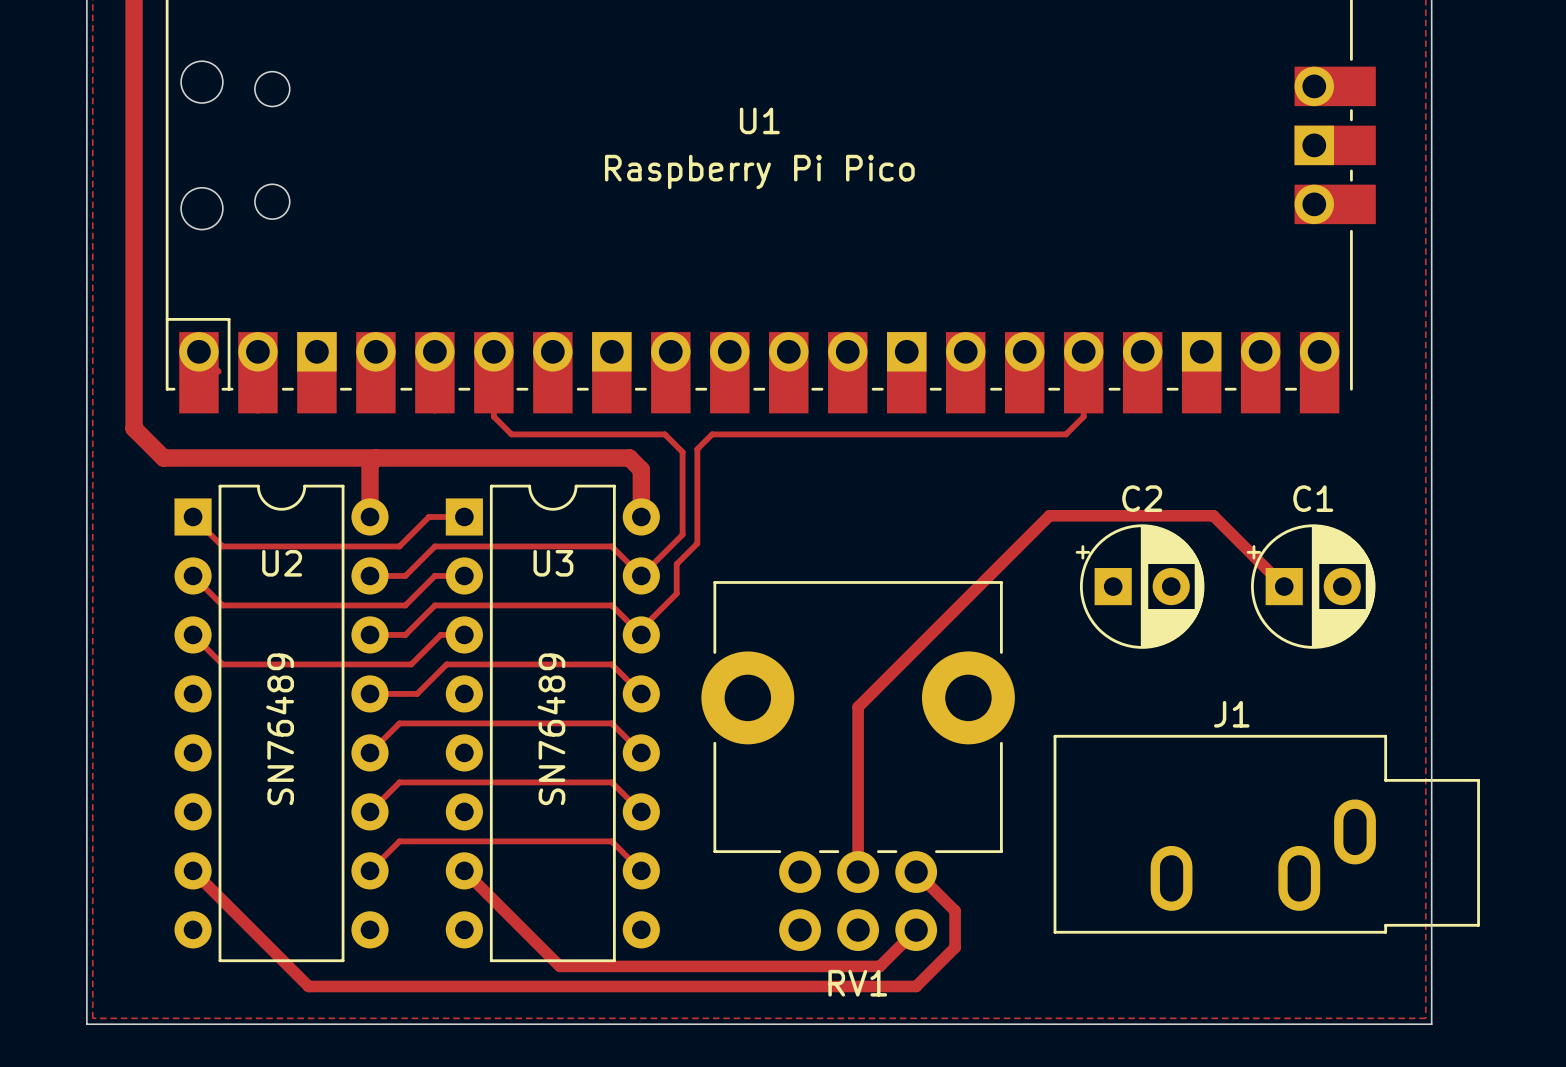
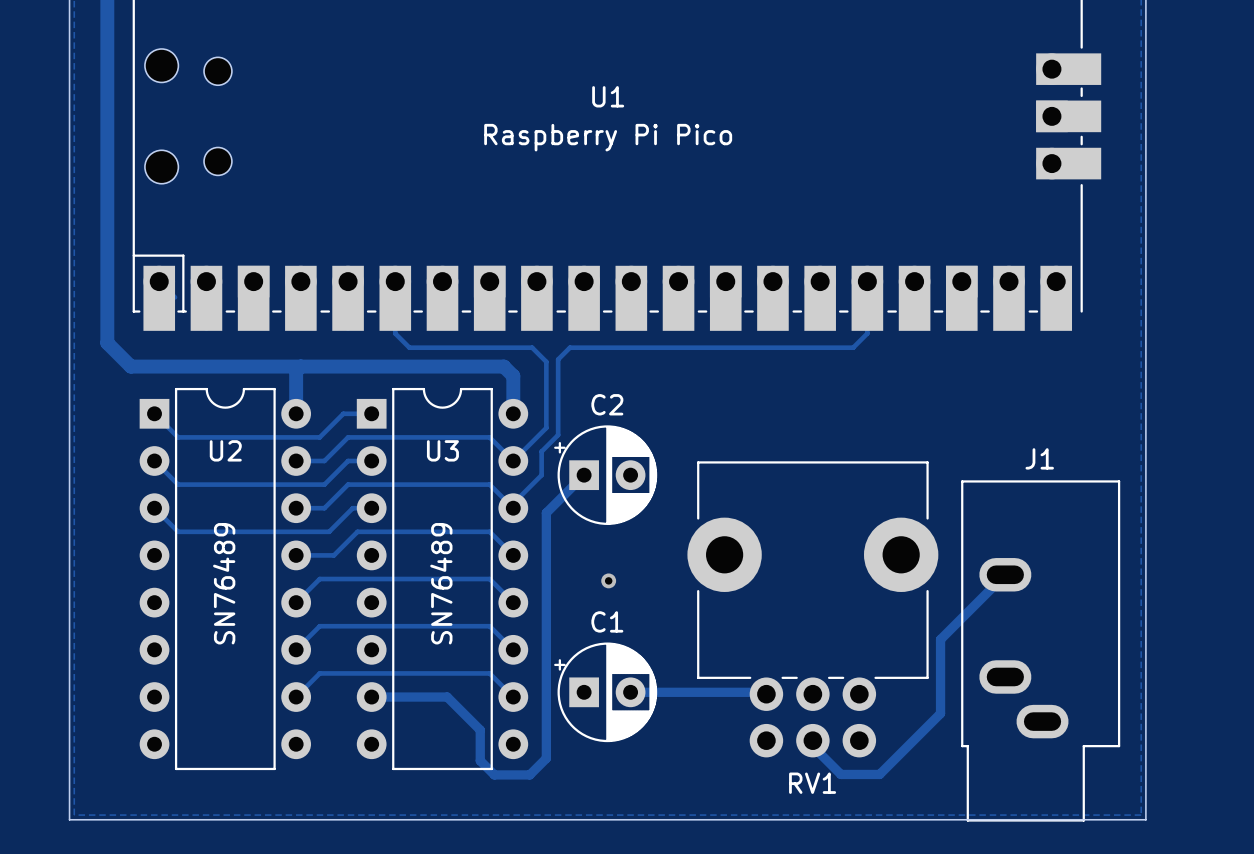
C2 position: (1140, 586) -> (605, 475)
track: (1284, 586) (1213, 515) (1049, 515) (858, 707) (858, 872) -> none
C1 position: (1311, 586) -> (605, 692)
J1 name position: J1 (1231, 714) -> J1 (1039, 458)
track: none -> (1005, 574) (940, 639) (940, 713) (879, 774) (840, 774) (812, 746) (812, 740)
via: none -> (608, 580)
RV1 position: (858, 766) -> (812, 609)
J1 rotation: 0° (1266, 834) -> 90° clockwise (1040, 650)
track: none -> (630, 692) (764, 692) (766, 694)
track: (193, 870) (308, 986) (916, 986) (955, 947) (955, 910) (916, 872) -> none
track: (464, 870) (559, 966) (879, 966) (916, 930) -> (371, 697) (447, 697) (480, 730) (480, 760) (494, 774) (529, 774) (546, 758) (546, 512) (584, 475)

